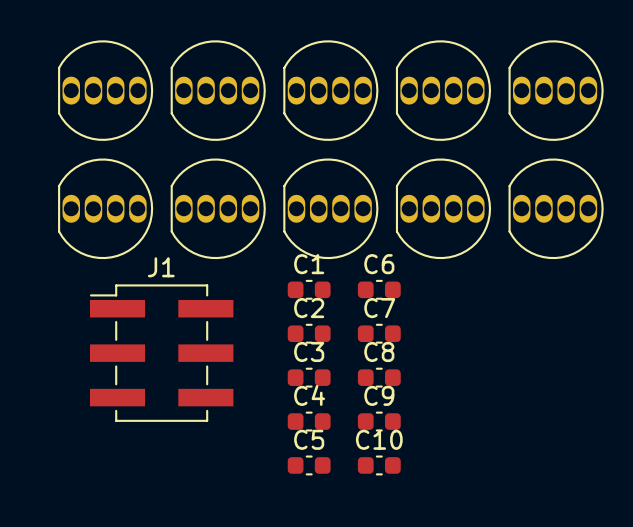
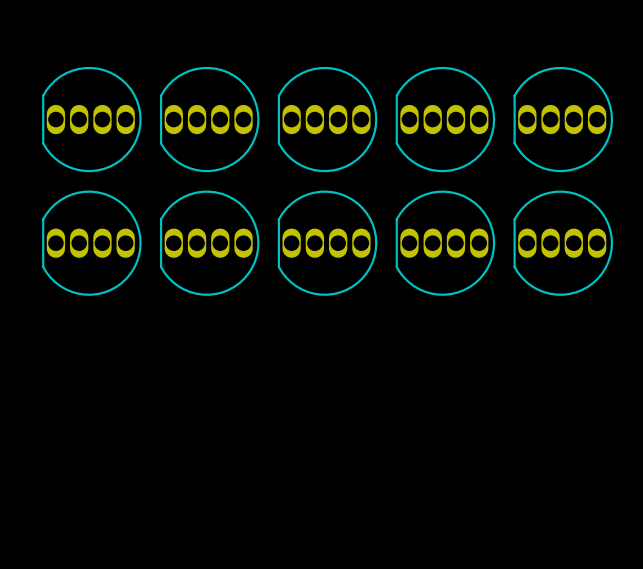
C1: (309, 289) -> none
C6: (379, 289) -> none
C2: (309, 333) -> none
C7: (379, 333) -> none
J1: (161, 353) -> none
C3: (309, 377) -> none
C8: (379, 377) -> none
C4: (309, 421) -> none
C9: (379, 421) -> none
C5: (309, 465) -> none
C10: (379, 465) -> none

